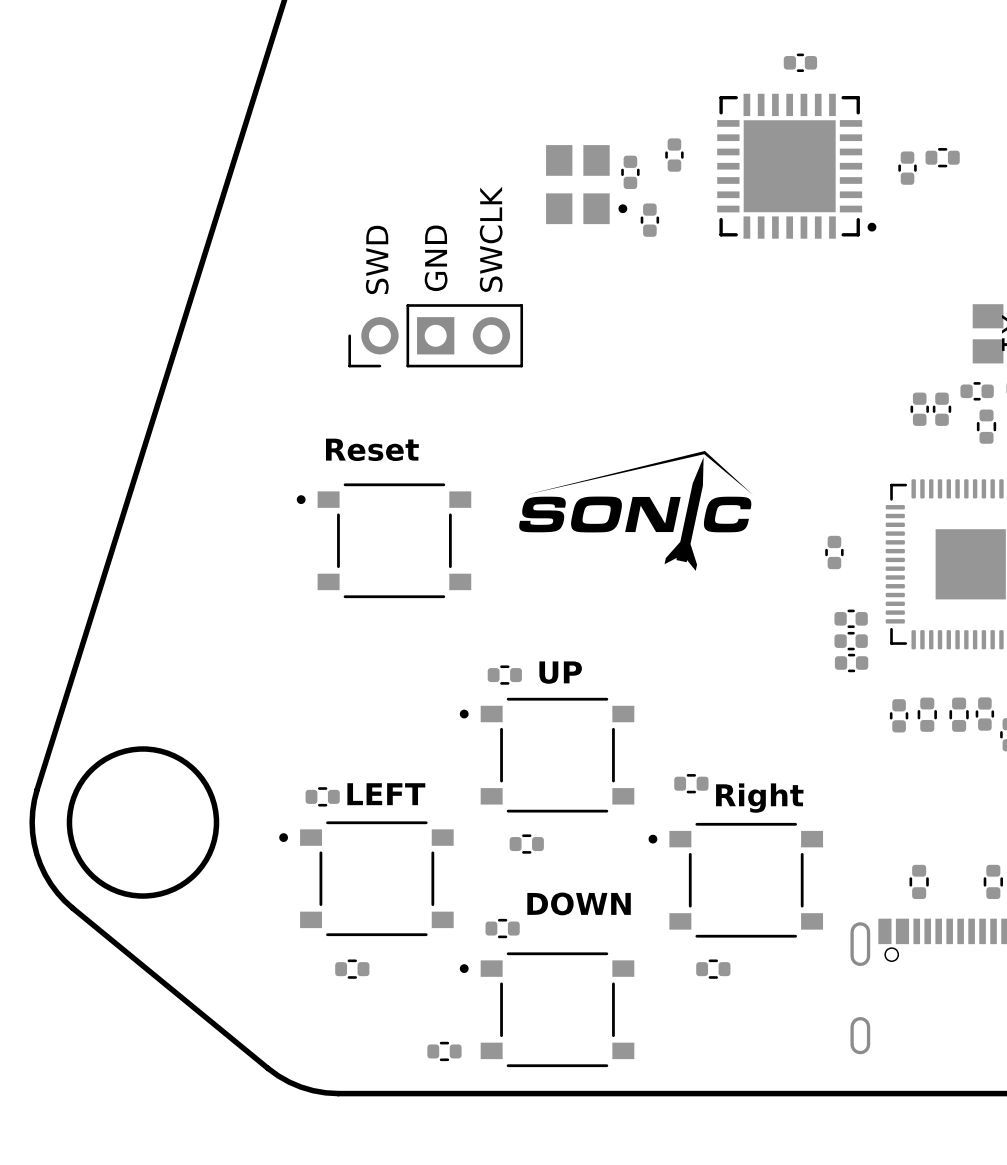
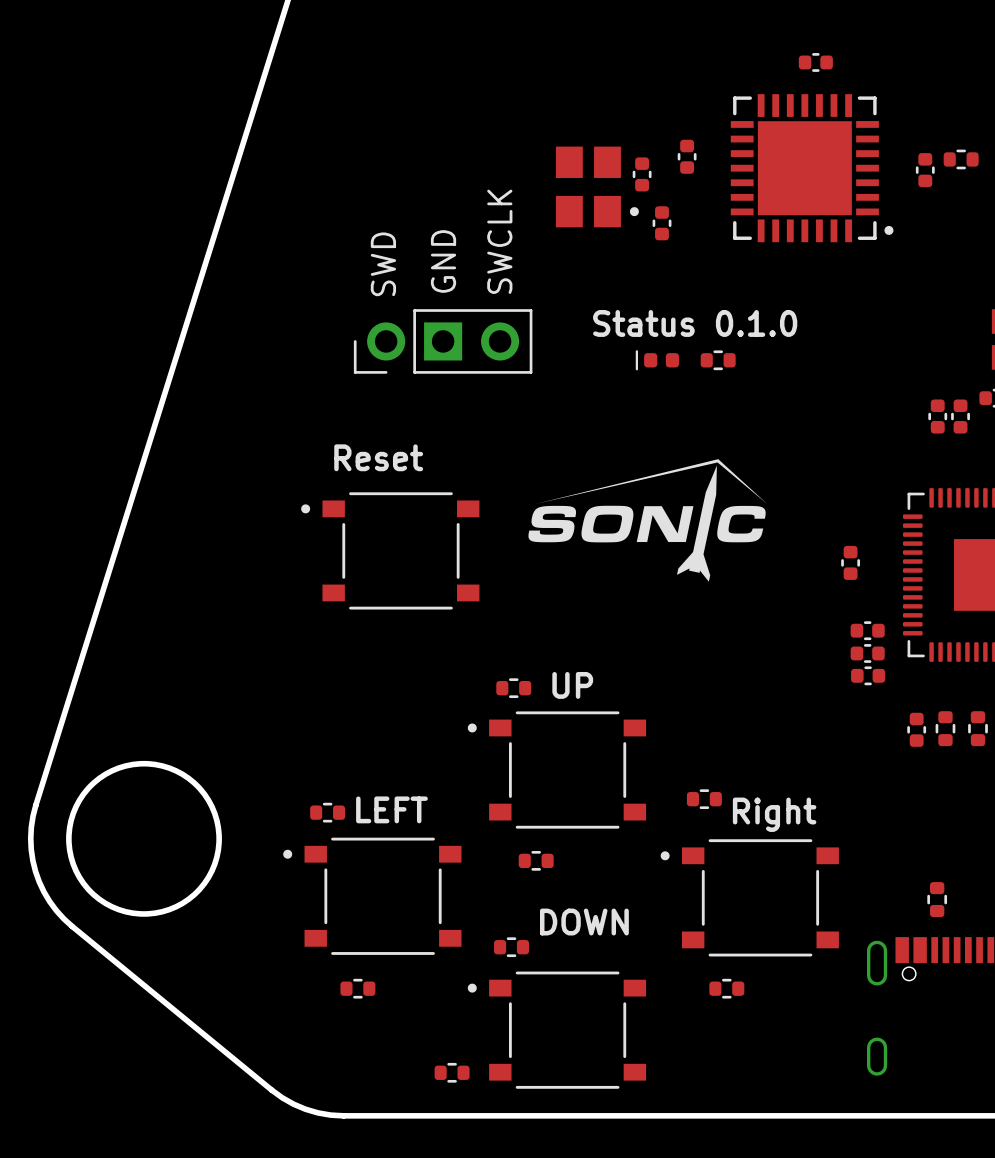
text: none -> Status 0.1.0 (695, 323)
part: none -> (657, 360)
part: none -> (718, 360)

